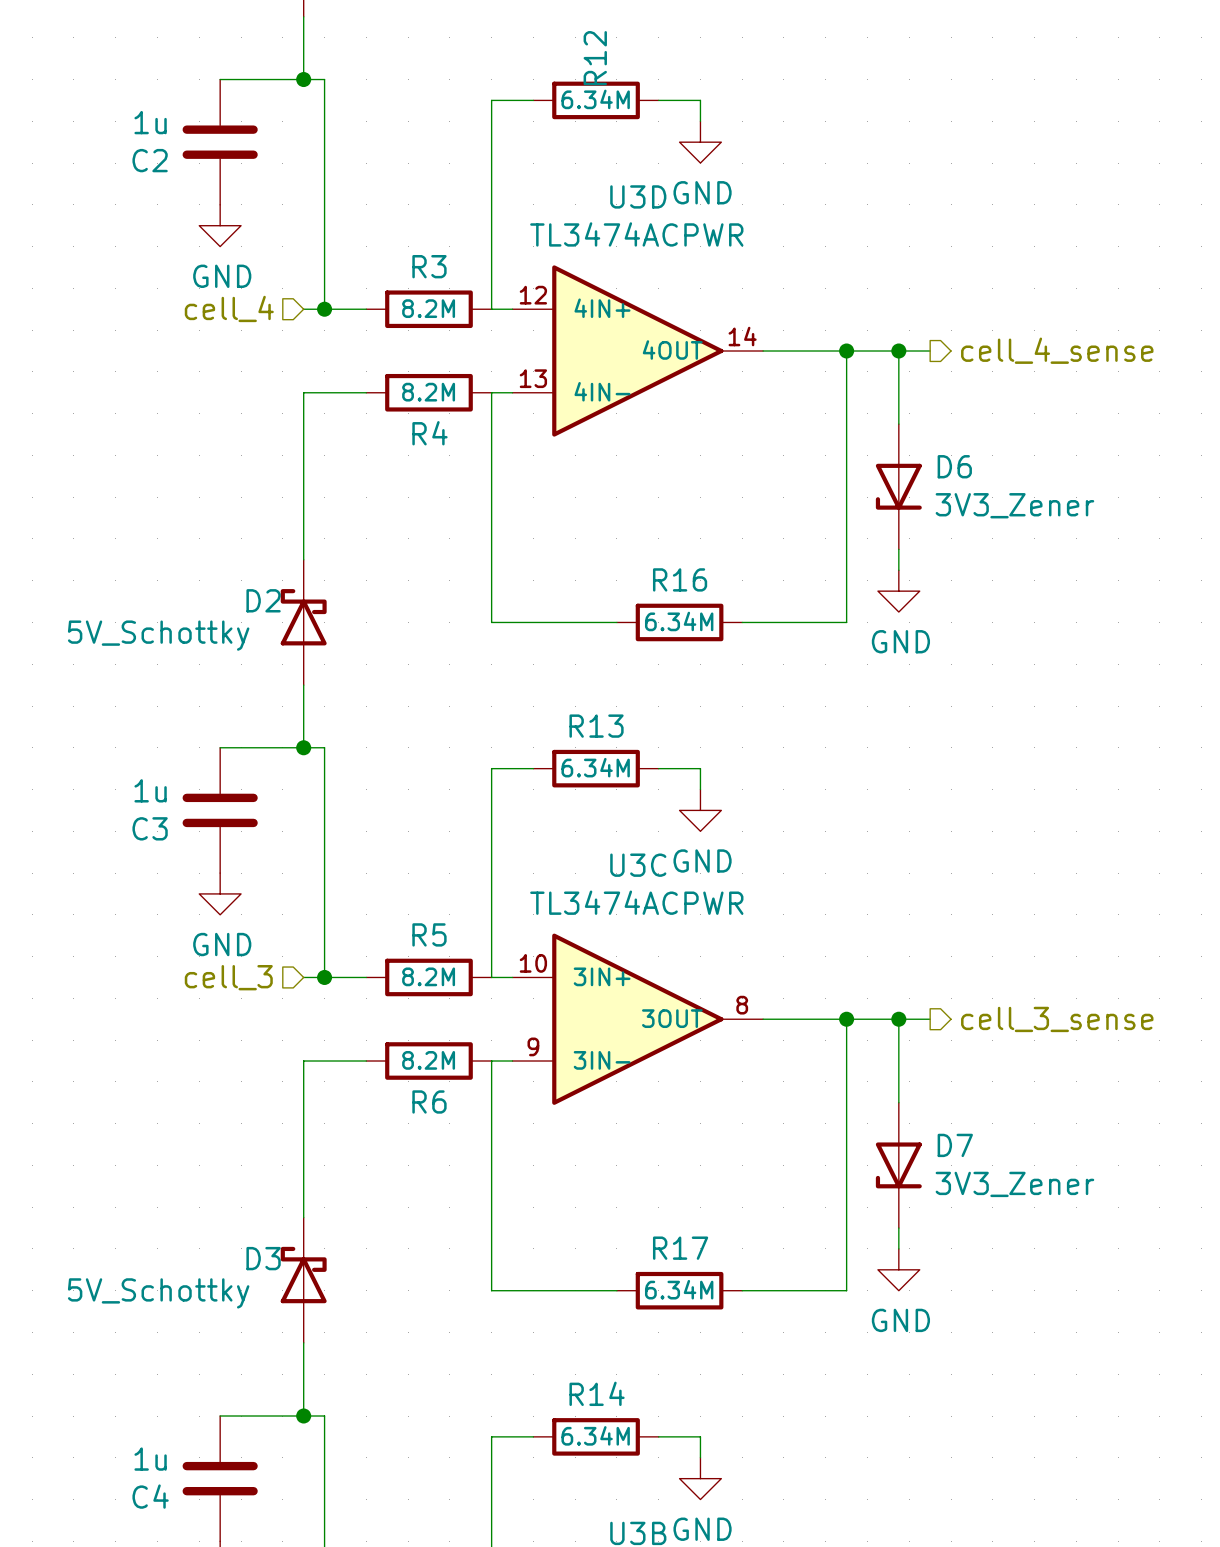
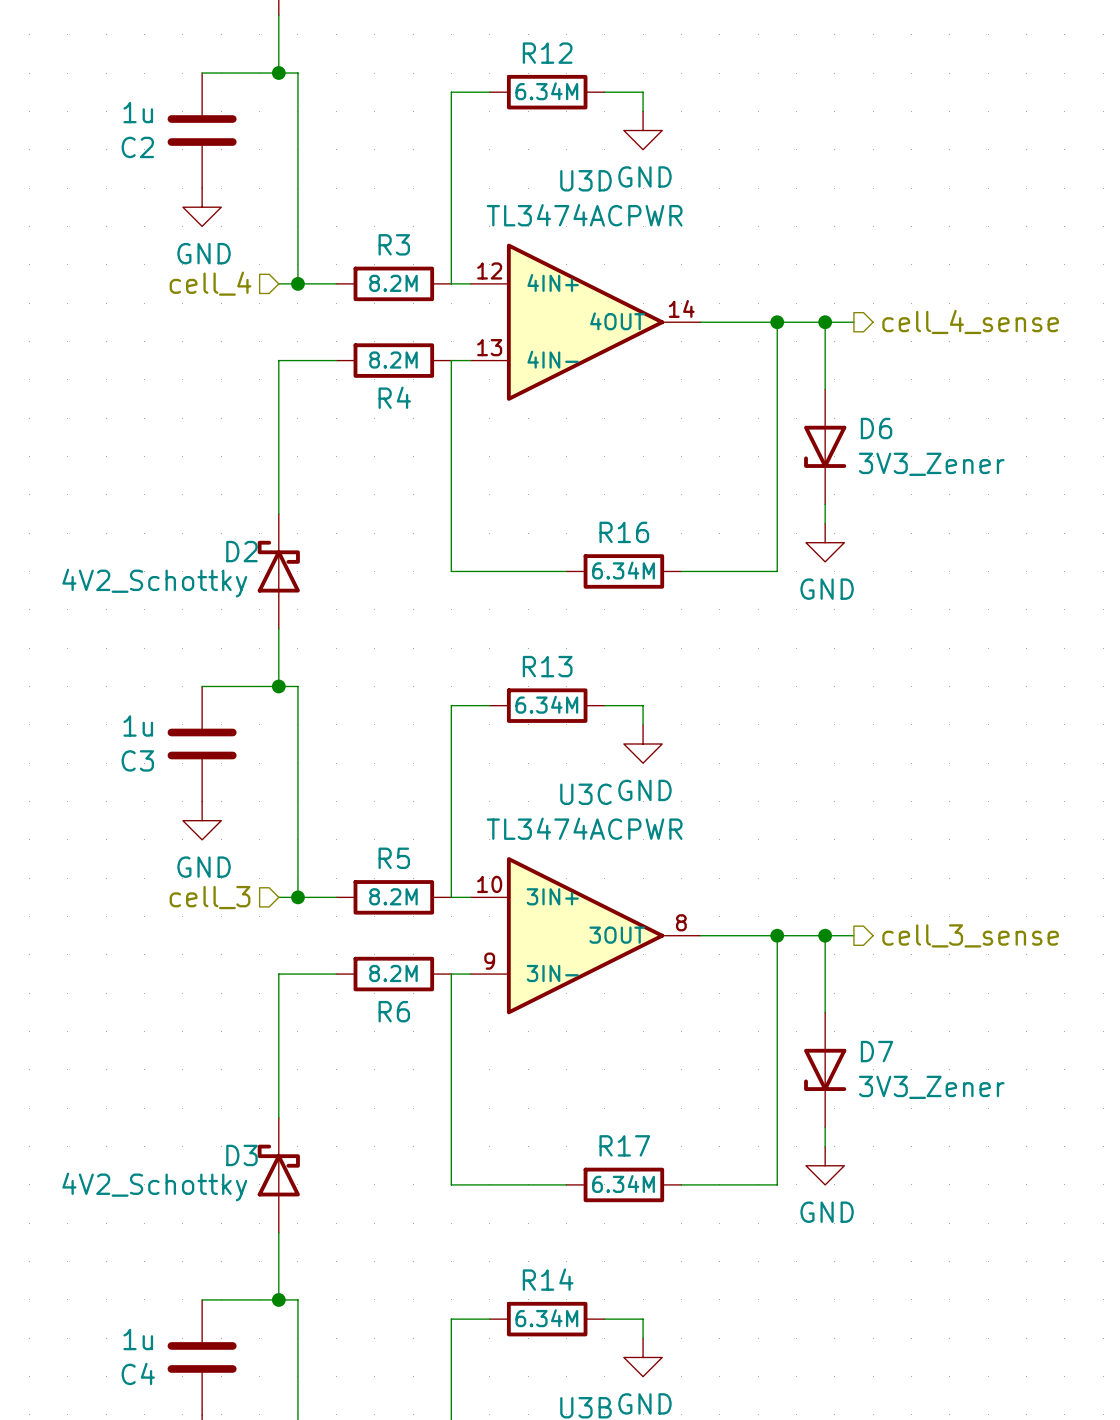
R12 name rotation: 0° (595, 58) -> 90° clockwise (547, 53)
D2 value: 5V_Schottky (158, 635) -> 4V2_Schottky (154, 583)
D3 value: 5V_Schottky (158, 1293) -> 4V2_Schottky (154, 1186)

